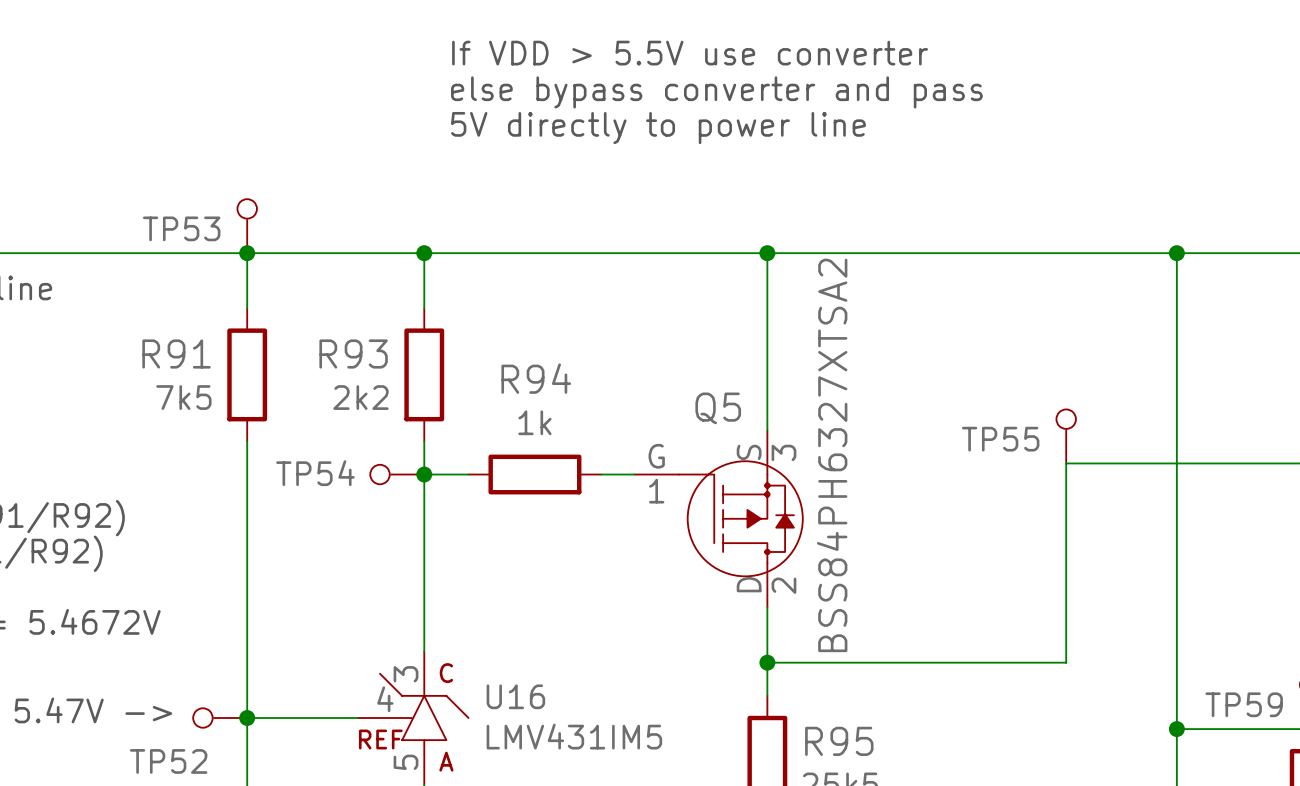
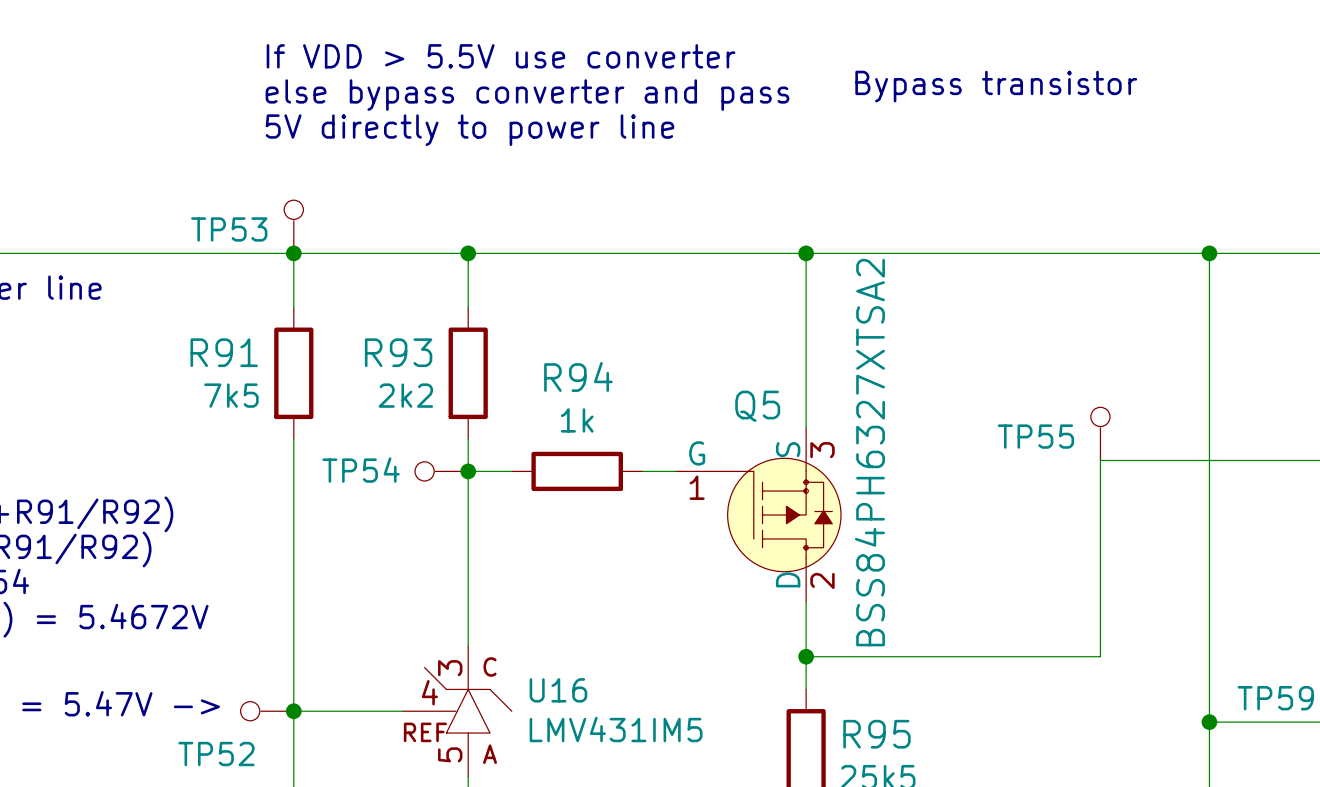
text position: If VDD > 5.5V use converter (690, 53) -> If VDD > 5.5V use converter (501, 56)
text: none -> Bypass transistor (996, 86)
text position: else bypass converter and pass (716, 92) -> else bypass converter and pass (527, 95)
text position: 5V directly to power line (658, 128) -> 5V directly to power line (469, 130)

